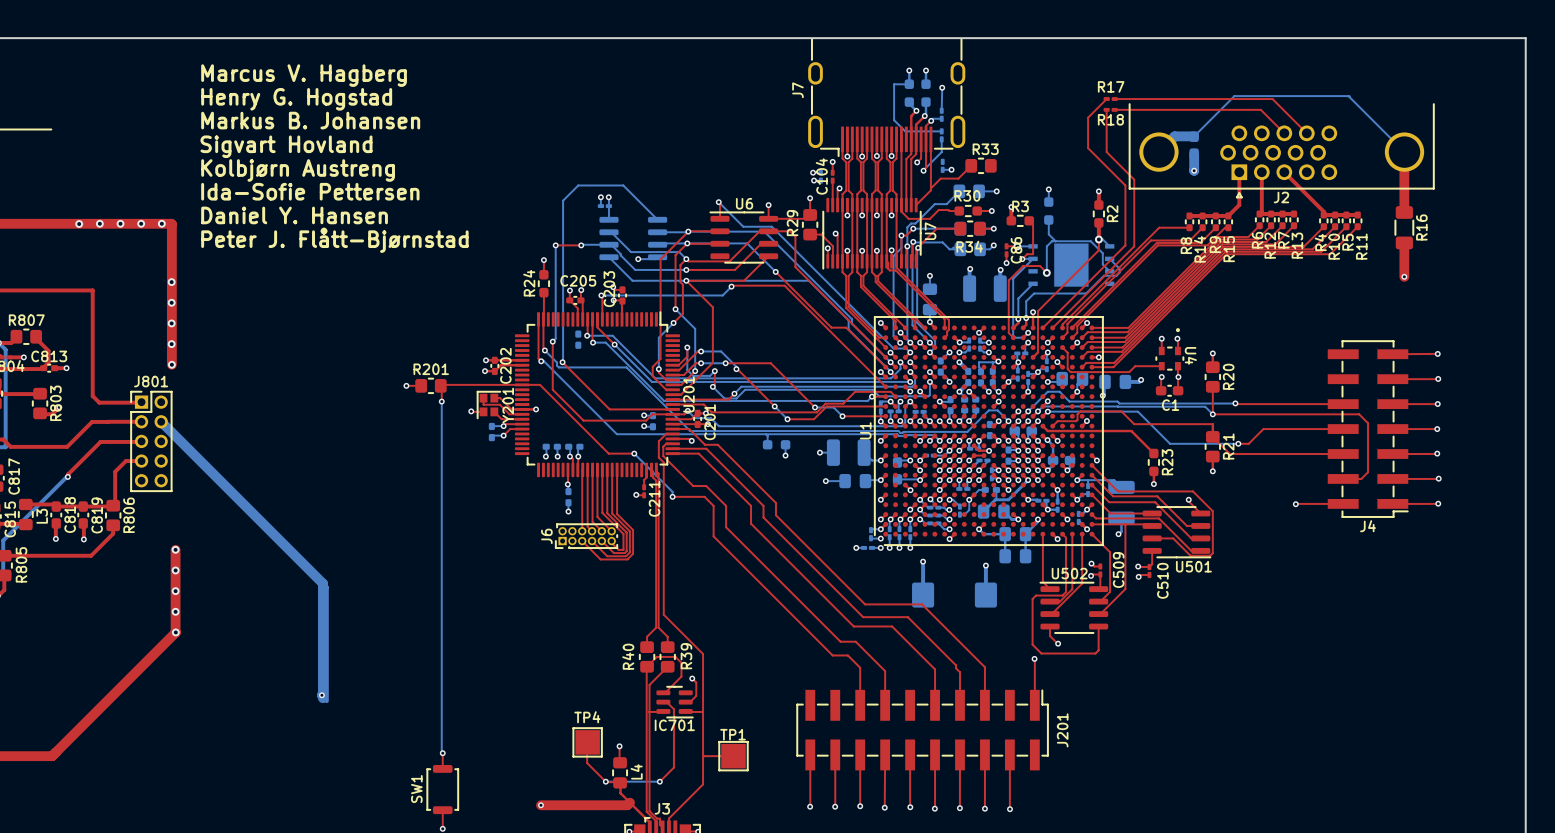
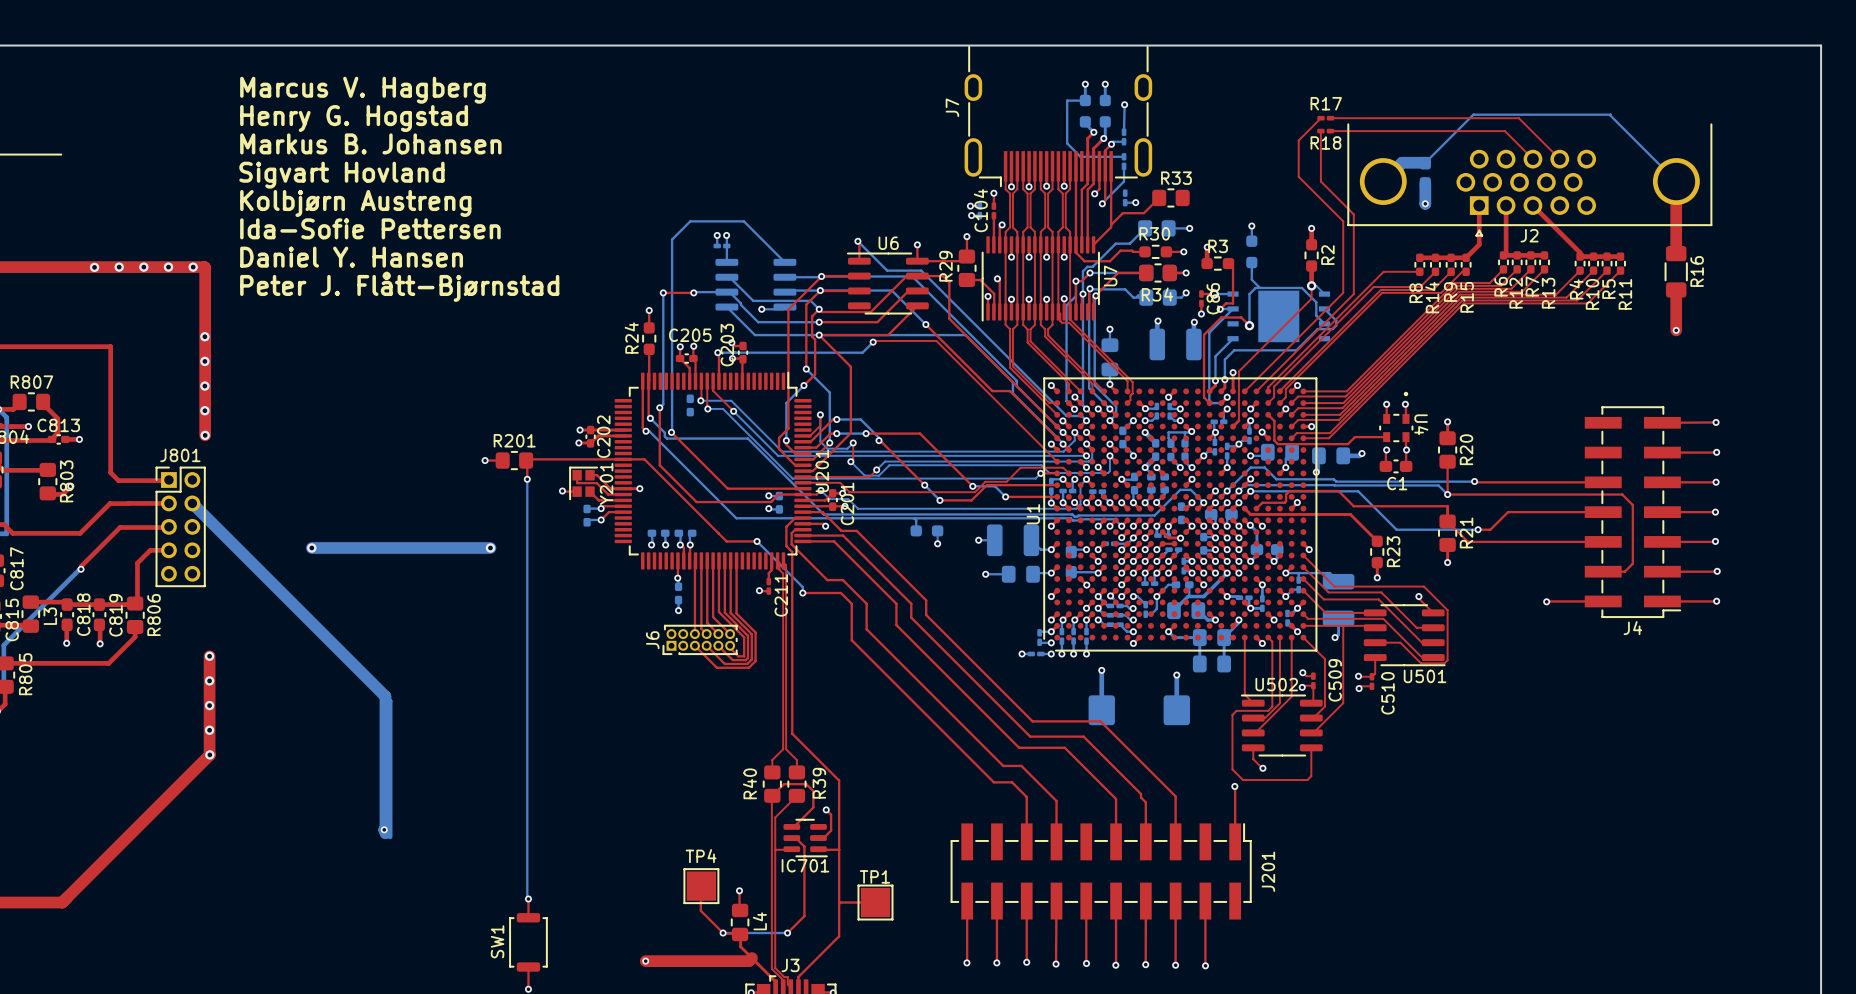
bottom track: none -> (311, 548) (490, 548)
via: none -> (311, 548)
via: none -> (490, 548)

